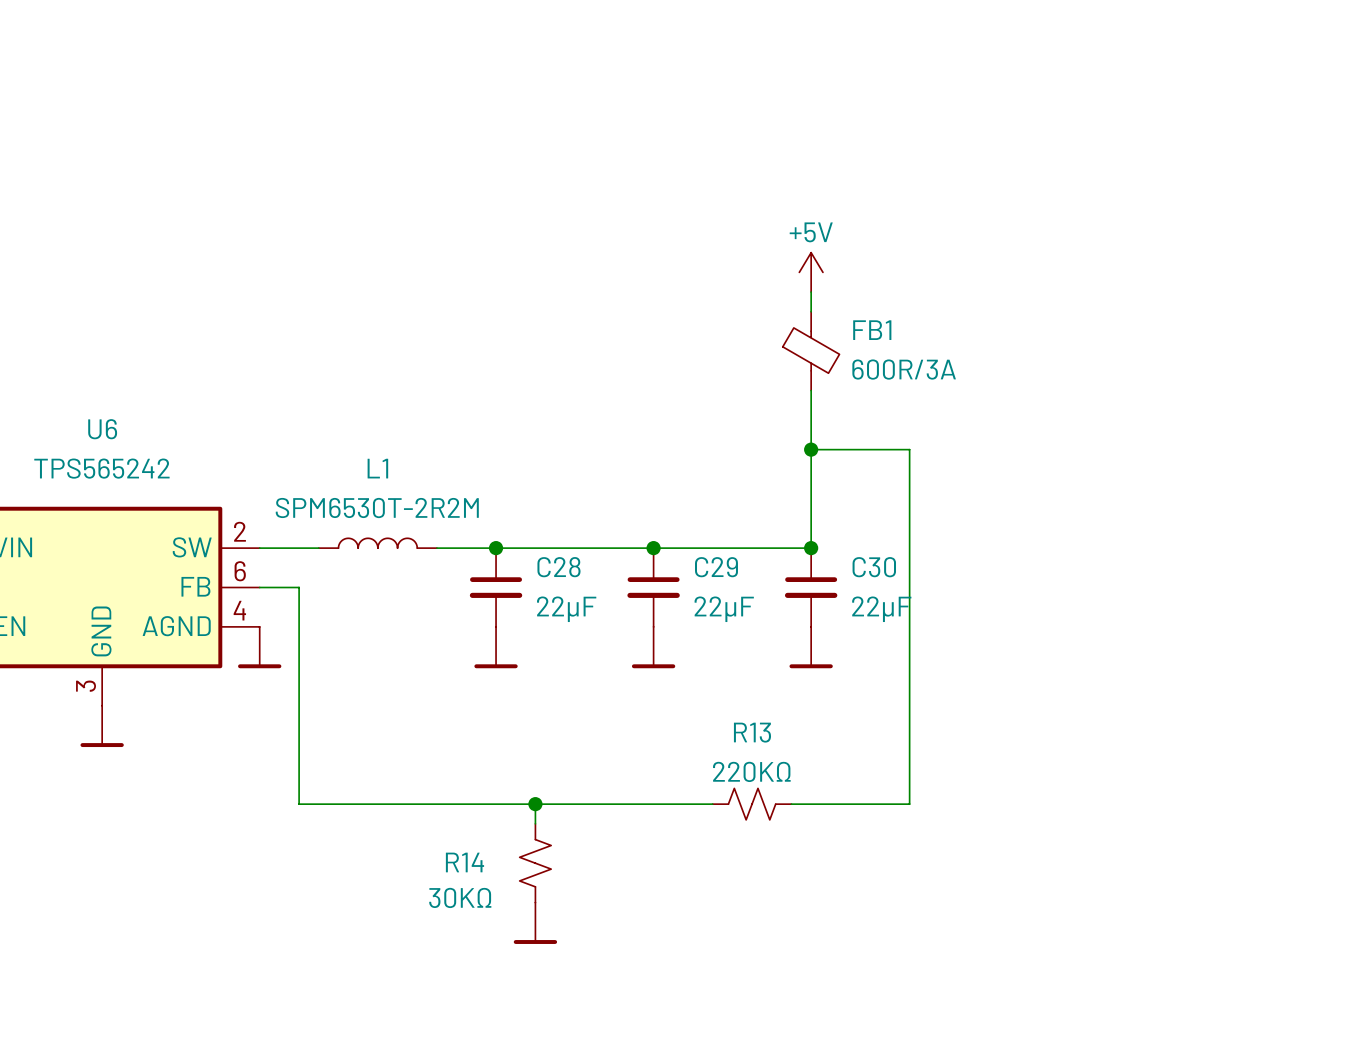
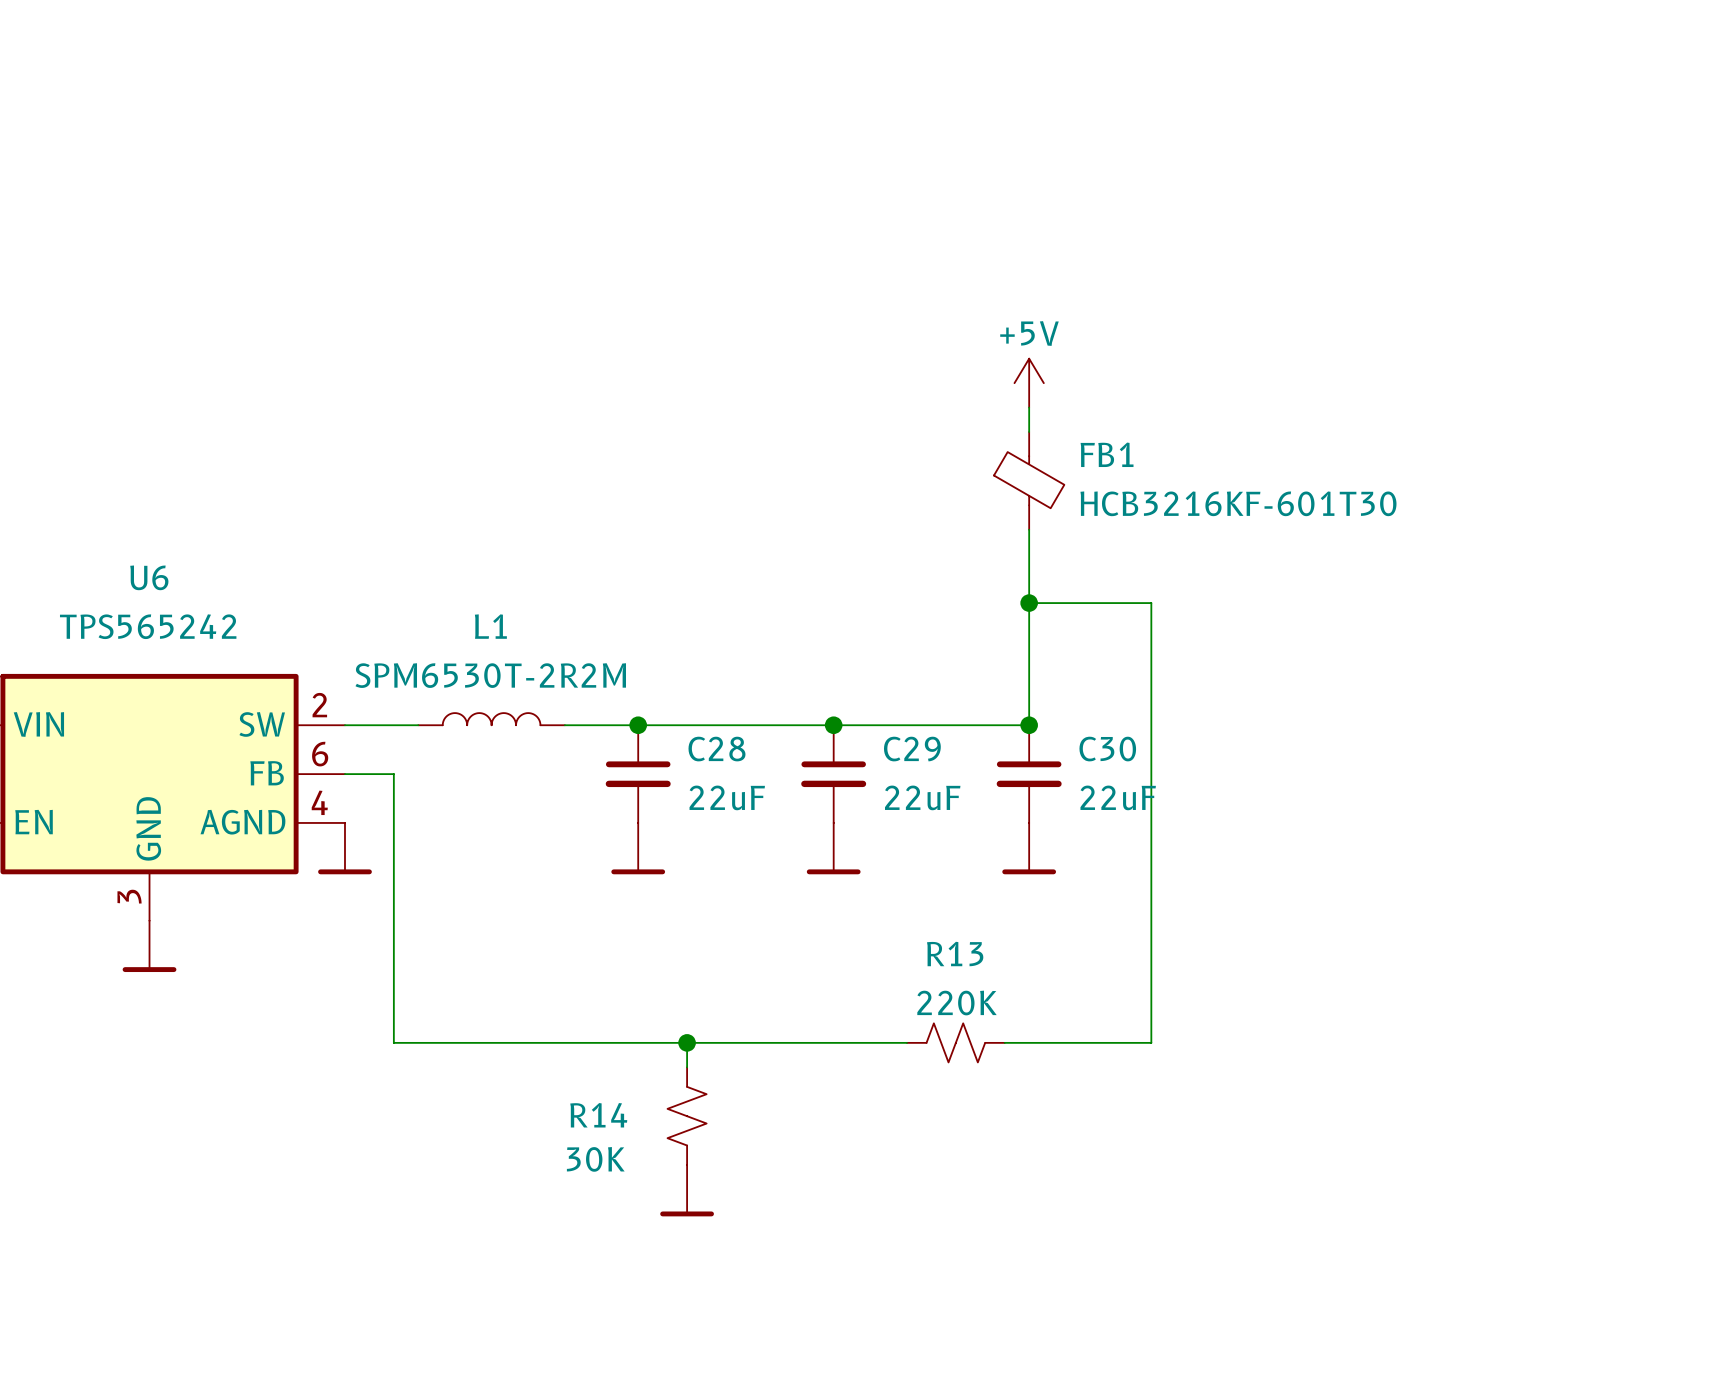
FB1 value: 600R/3A (904, 369) -> HCB3216KF-601T30 (1238, 503)
C28 value: 22µF (566, 609) -> 22uF (727, 797)
C29 value: 22µF (724, 609) -> 22uF (922, 797)
C30 value: 22µF (881, 609) -> 22uF (1118, 797)
R13 value: 220KΩ (751, 771) -> 220K (957, 1003)
R14 value: 30KΩ (460, 897) -> 30K (595, 1159)

